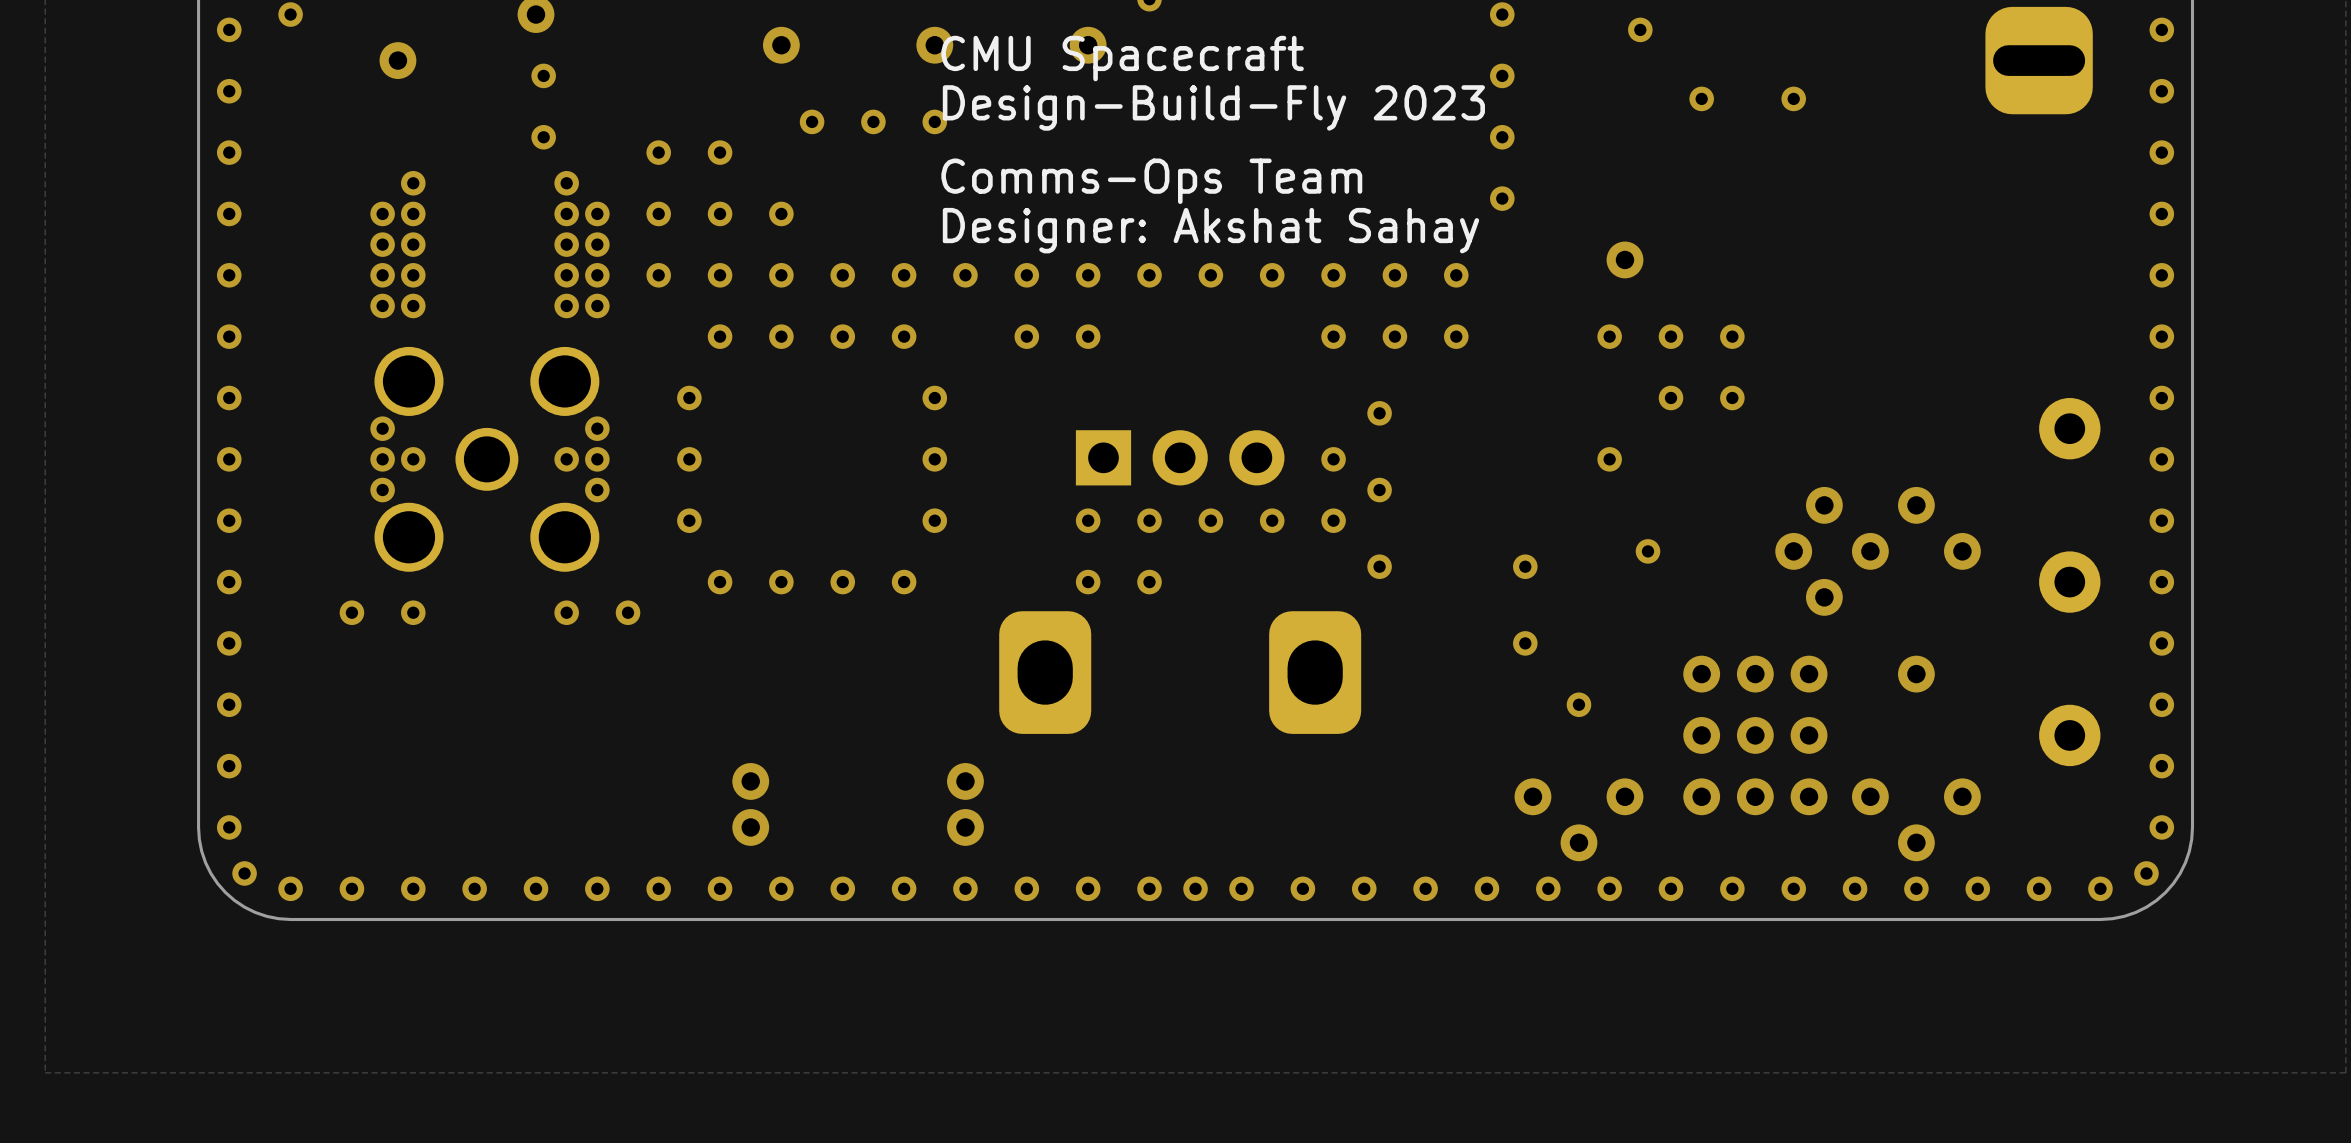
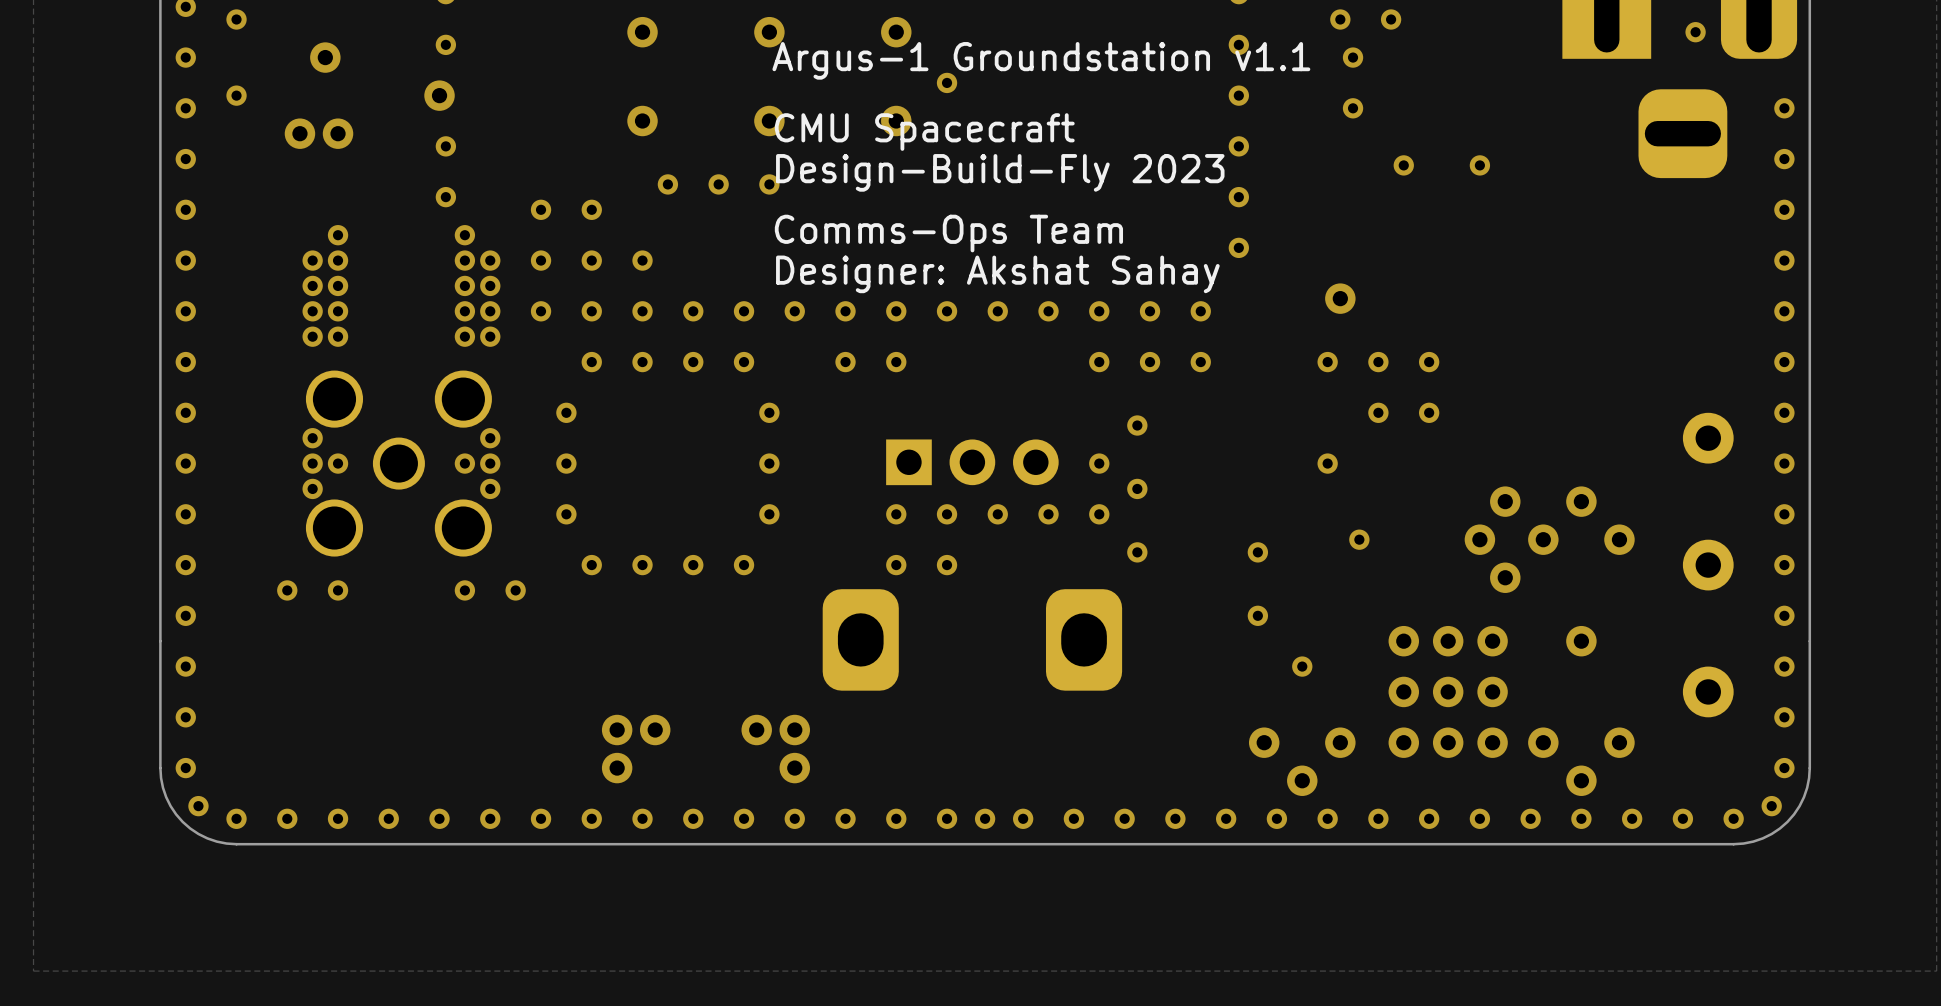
via: none -> (299, 133)
via: (397, 60) -> none
via: none -> (338, 133)
via: none -> (655, 730)
via: none -> (756, 730)

